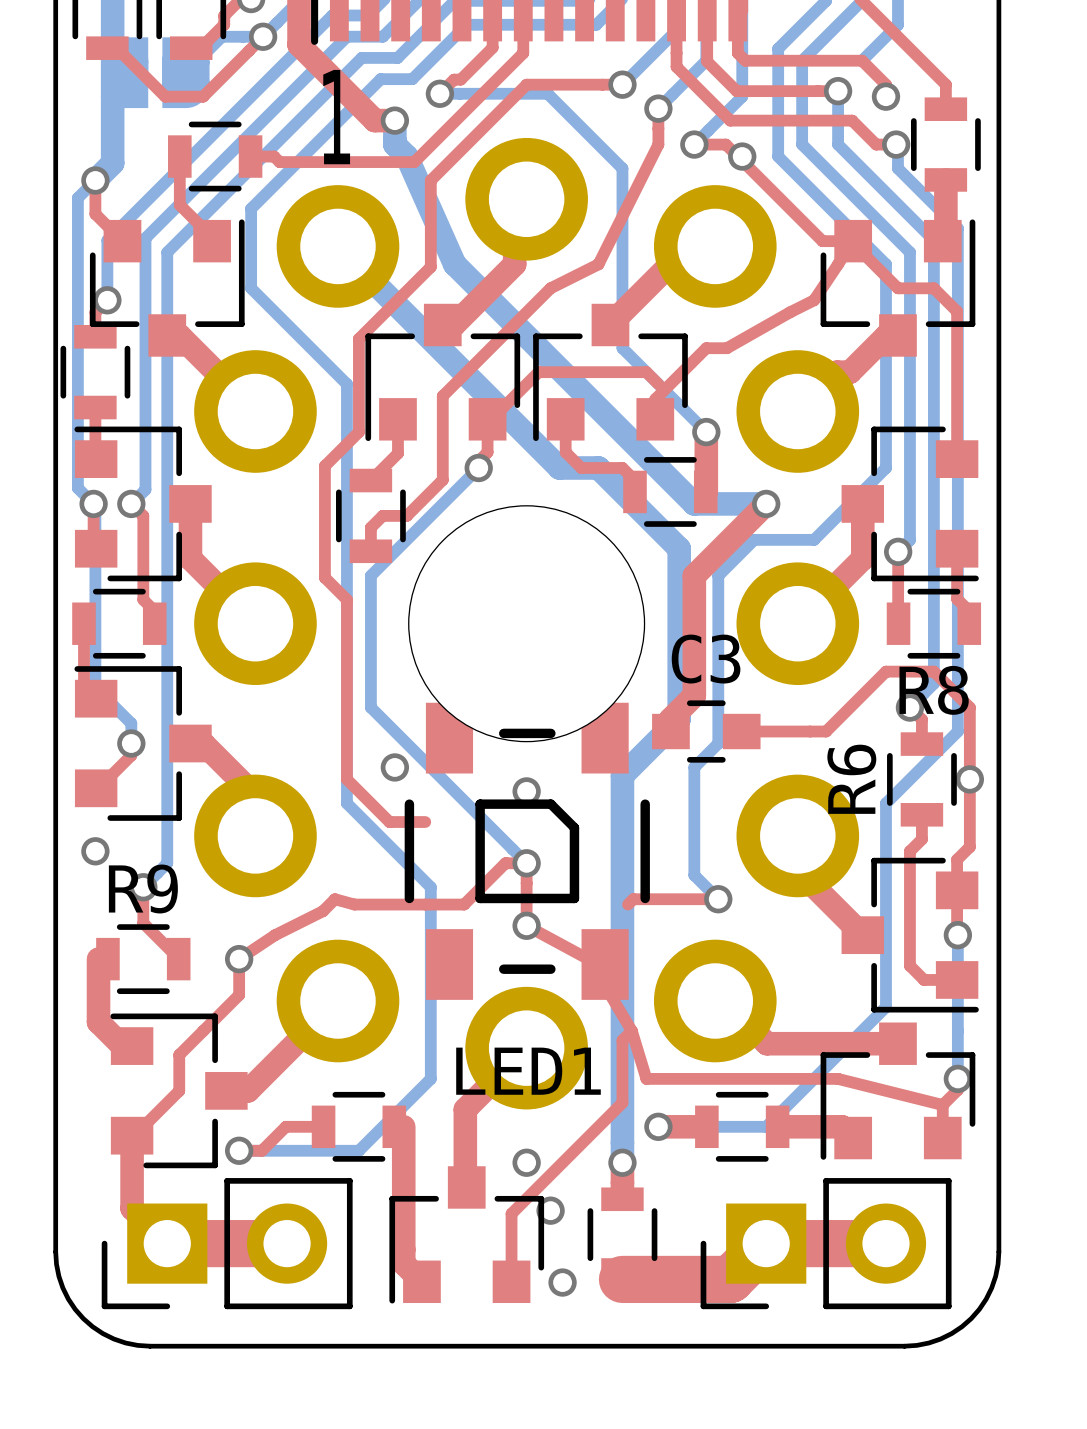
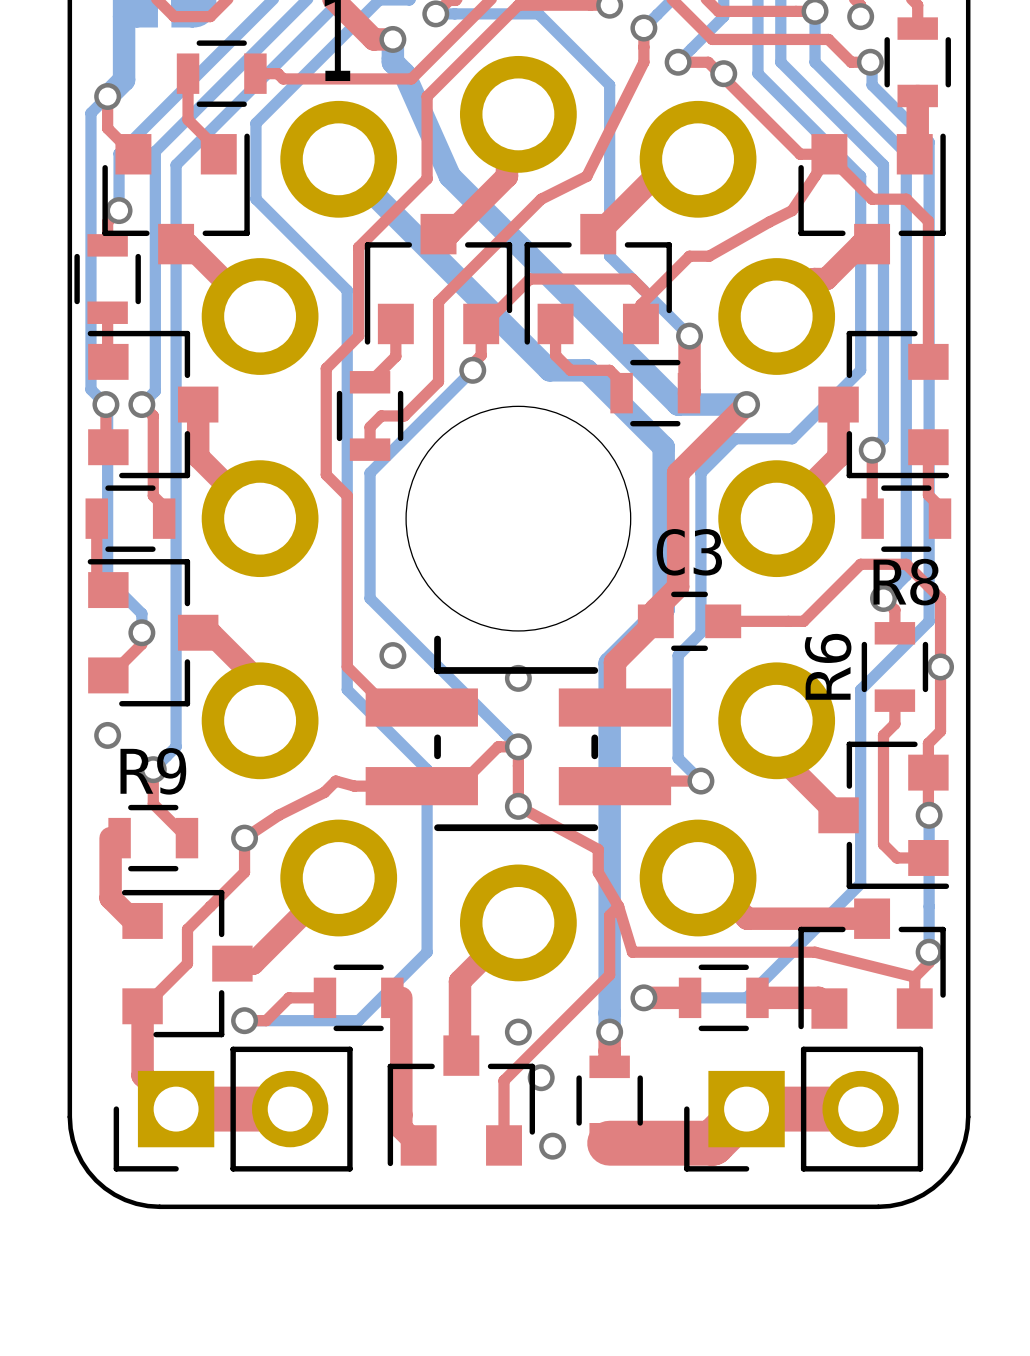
top track: none -> (655, 621) (614, 662) (614, 707)
part: none -> (518, 733)
LED1: (527, 851) -> none

